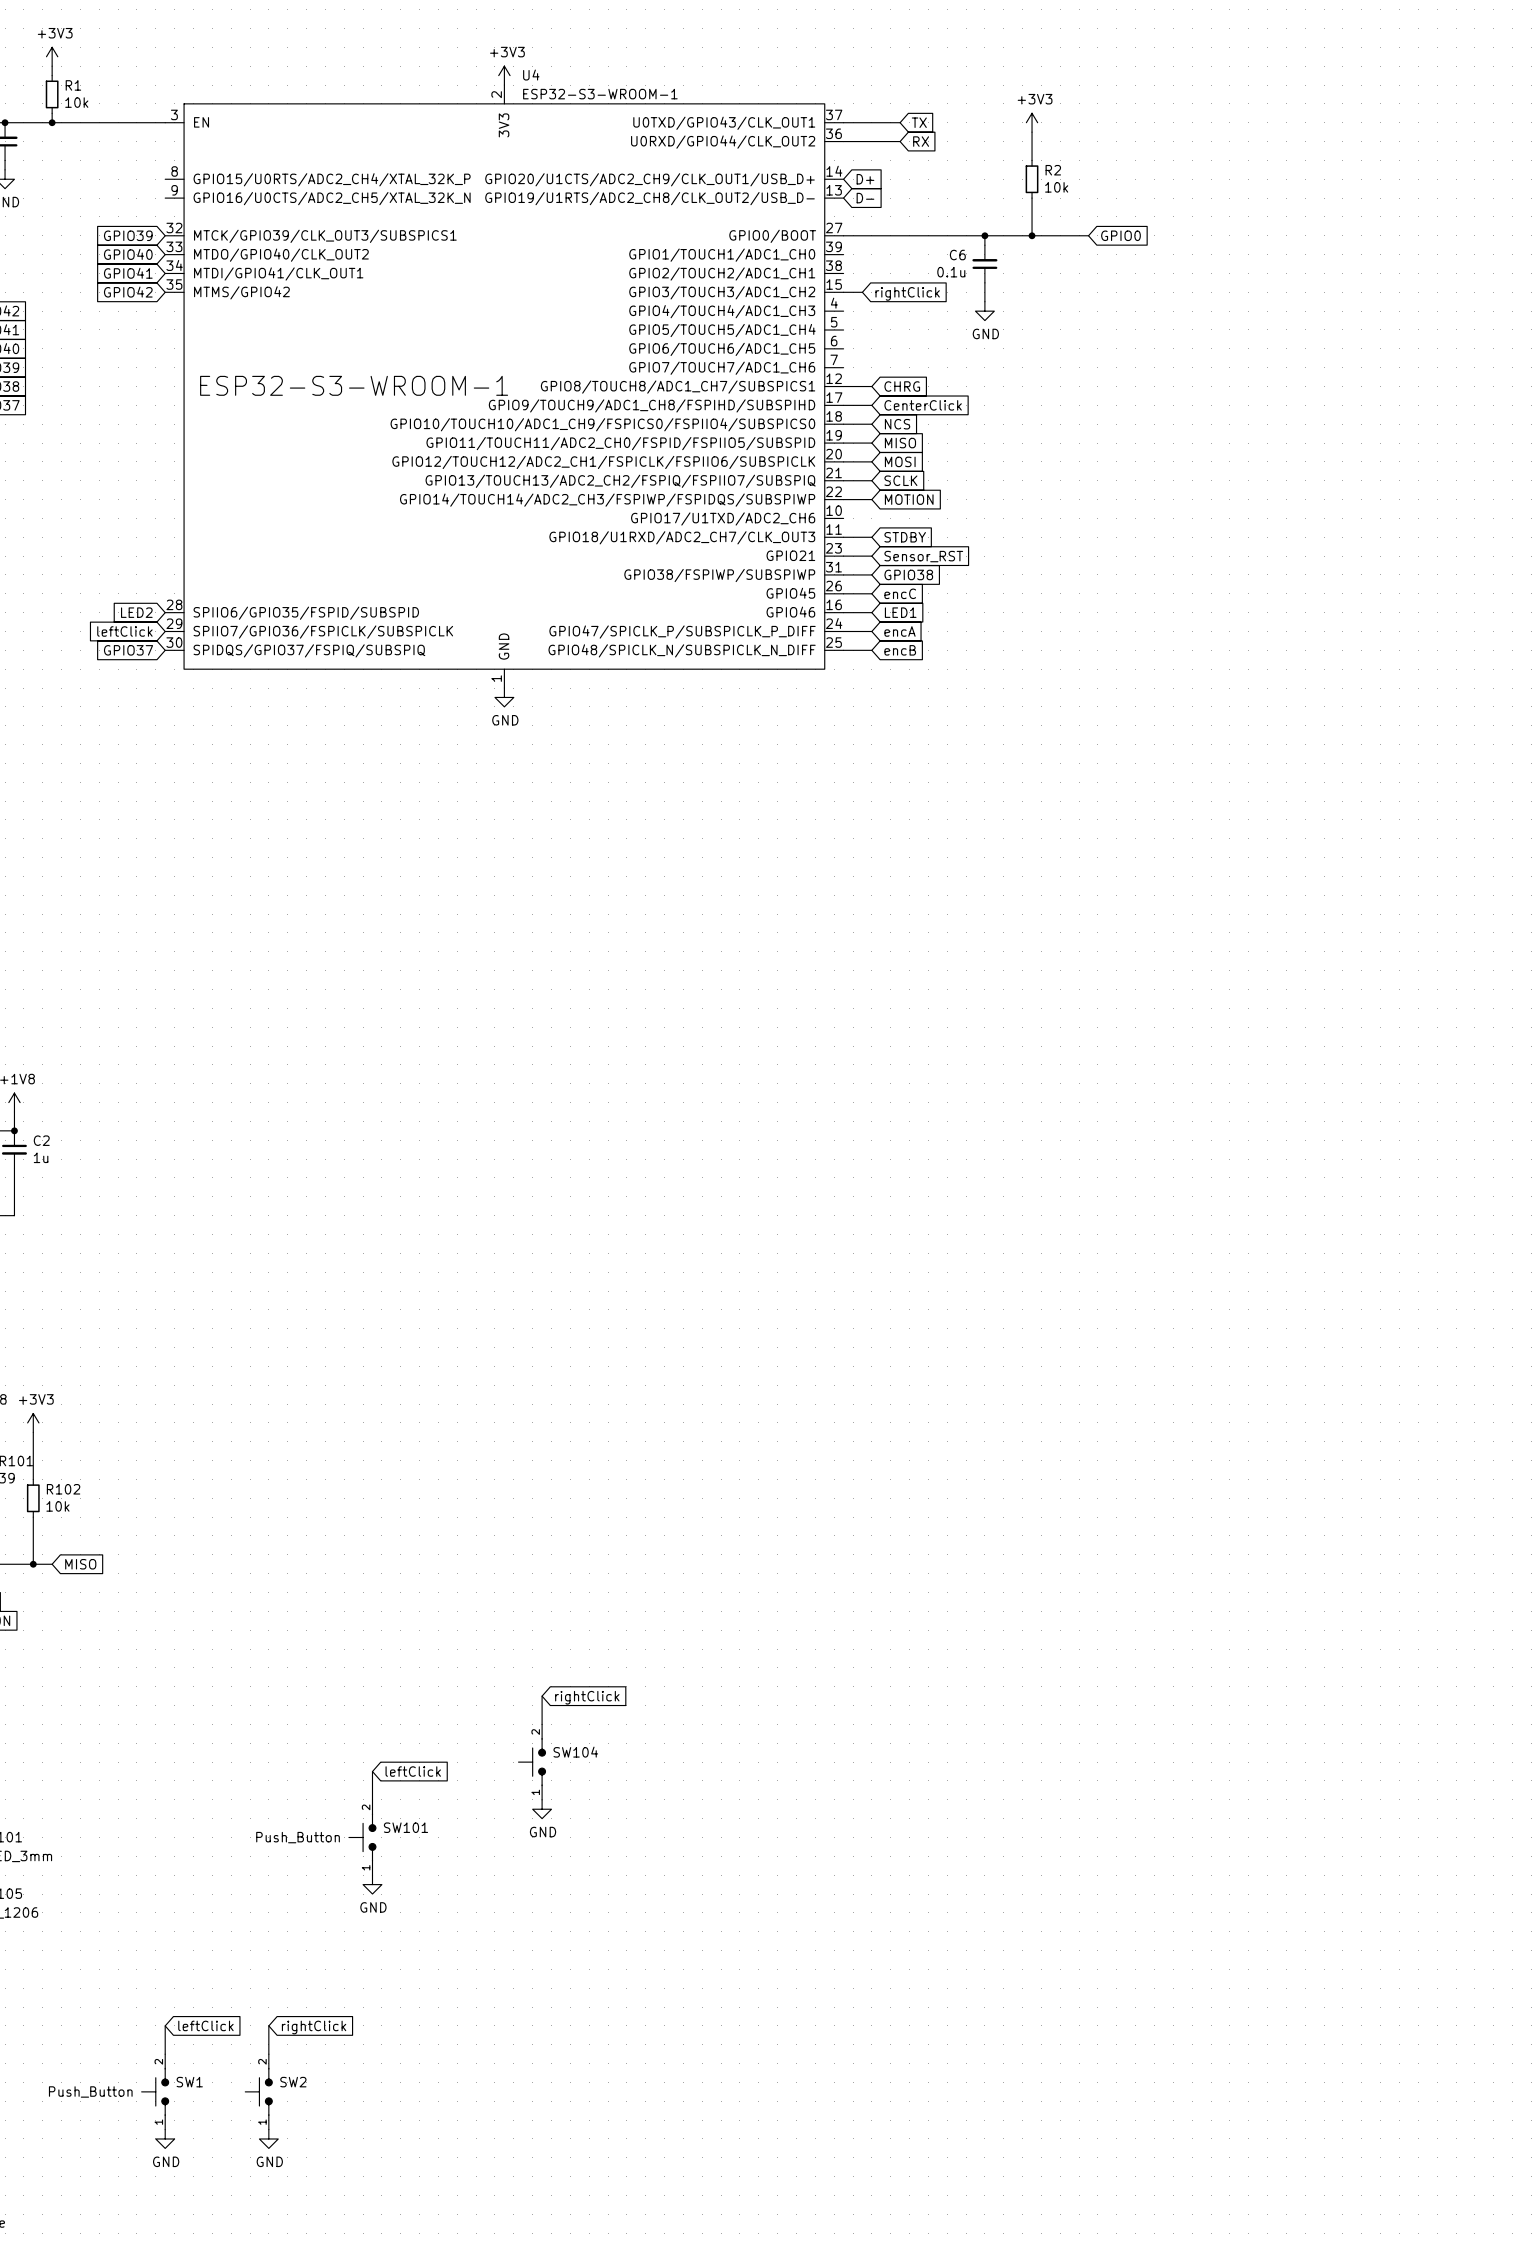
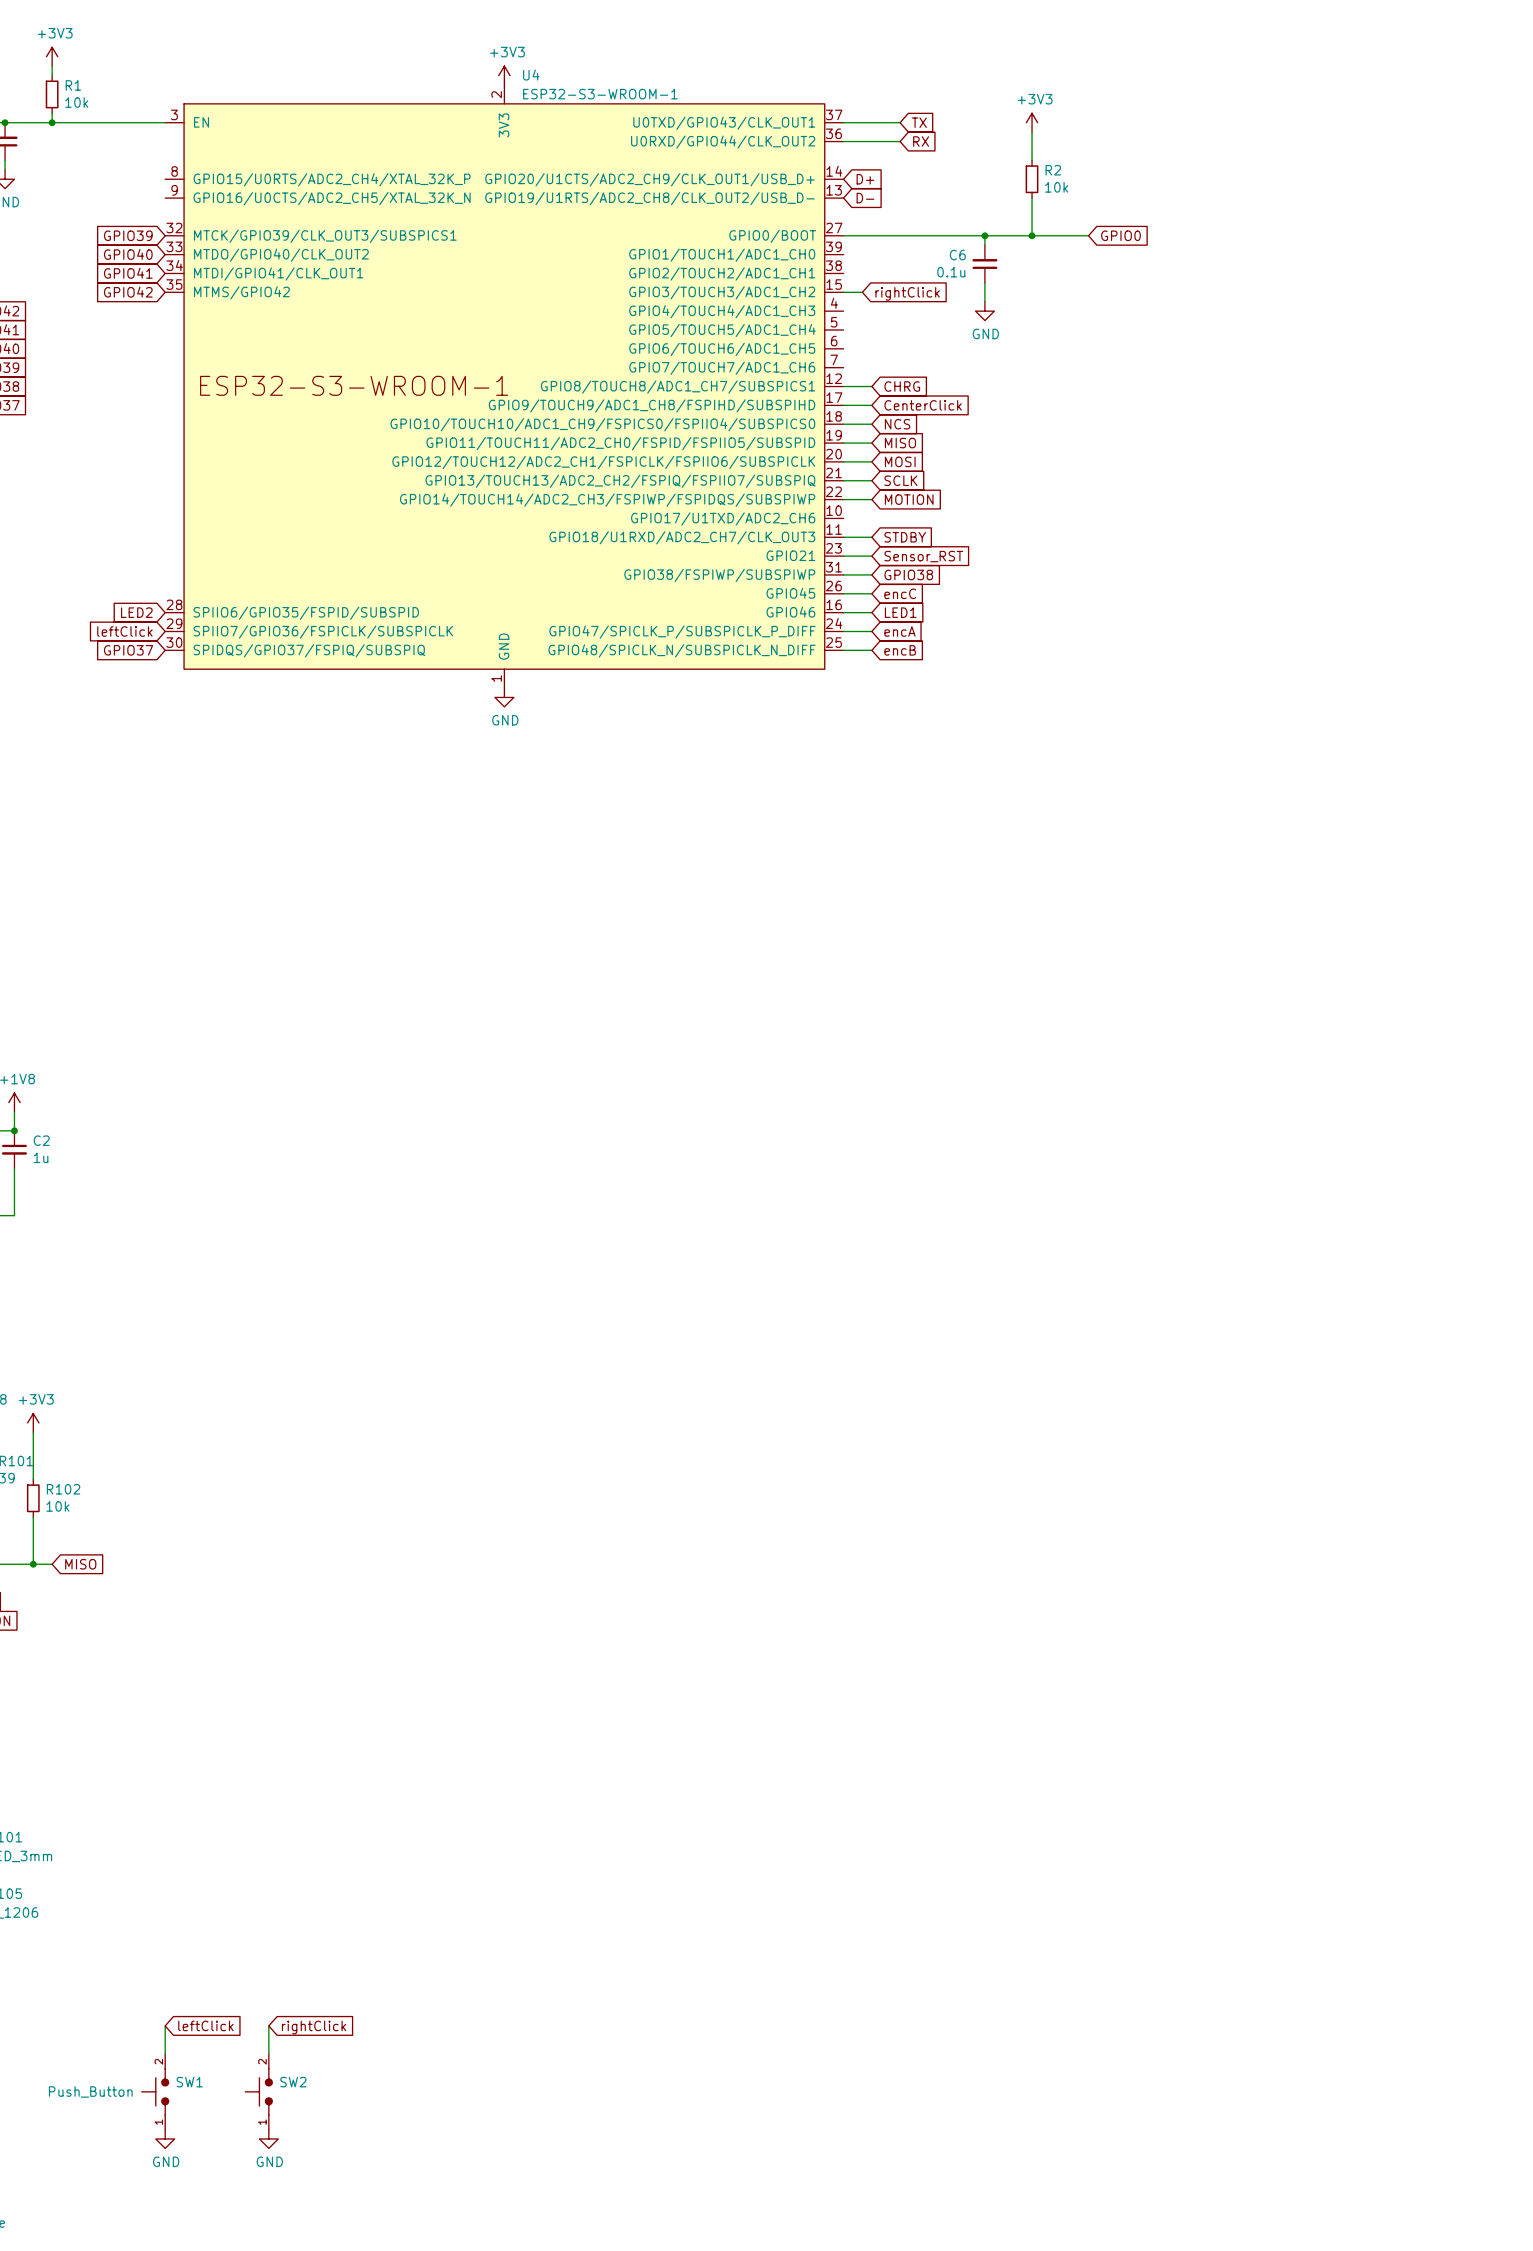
wire: (542, 1696) (542, 1724) -> none
global label: rightClick (587, 1697) -> none
SW104: (532, 1762) -> none
wire: (372, 1771) (372, 1799) -> none
global label: leftClick (413, 1771) -> none
power symbol: GND (542, 1809) -> none
SW101: Push_Button (362, 1837) -> none
power symbol: GND (372, 1884) -> none

